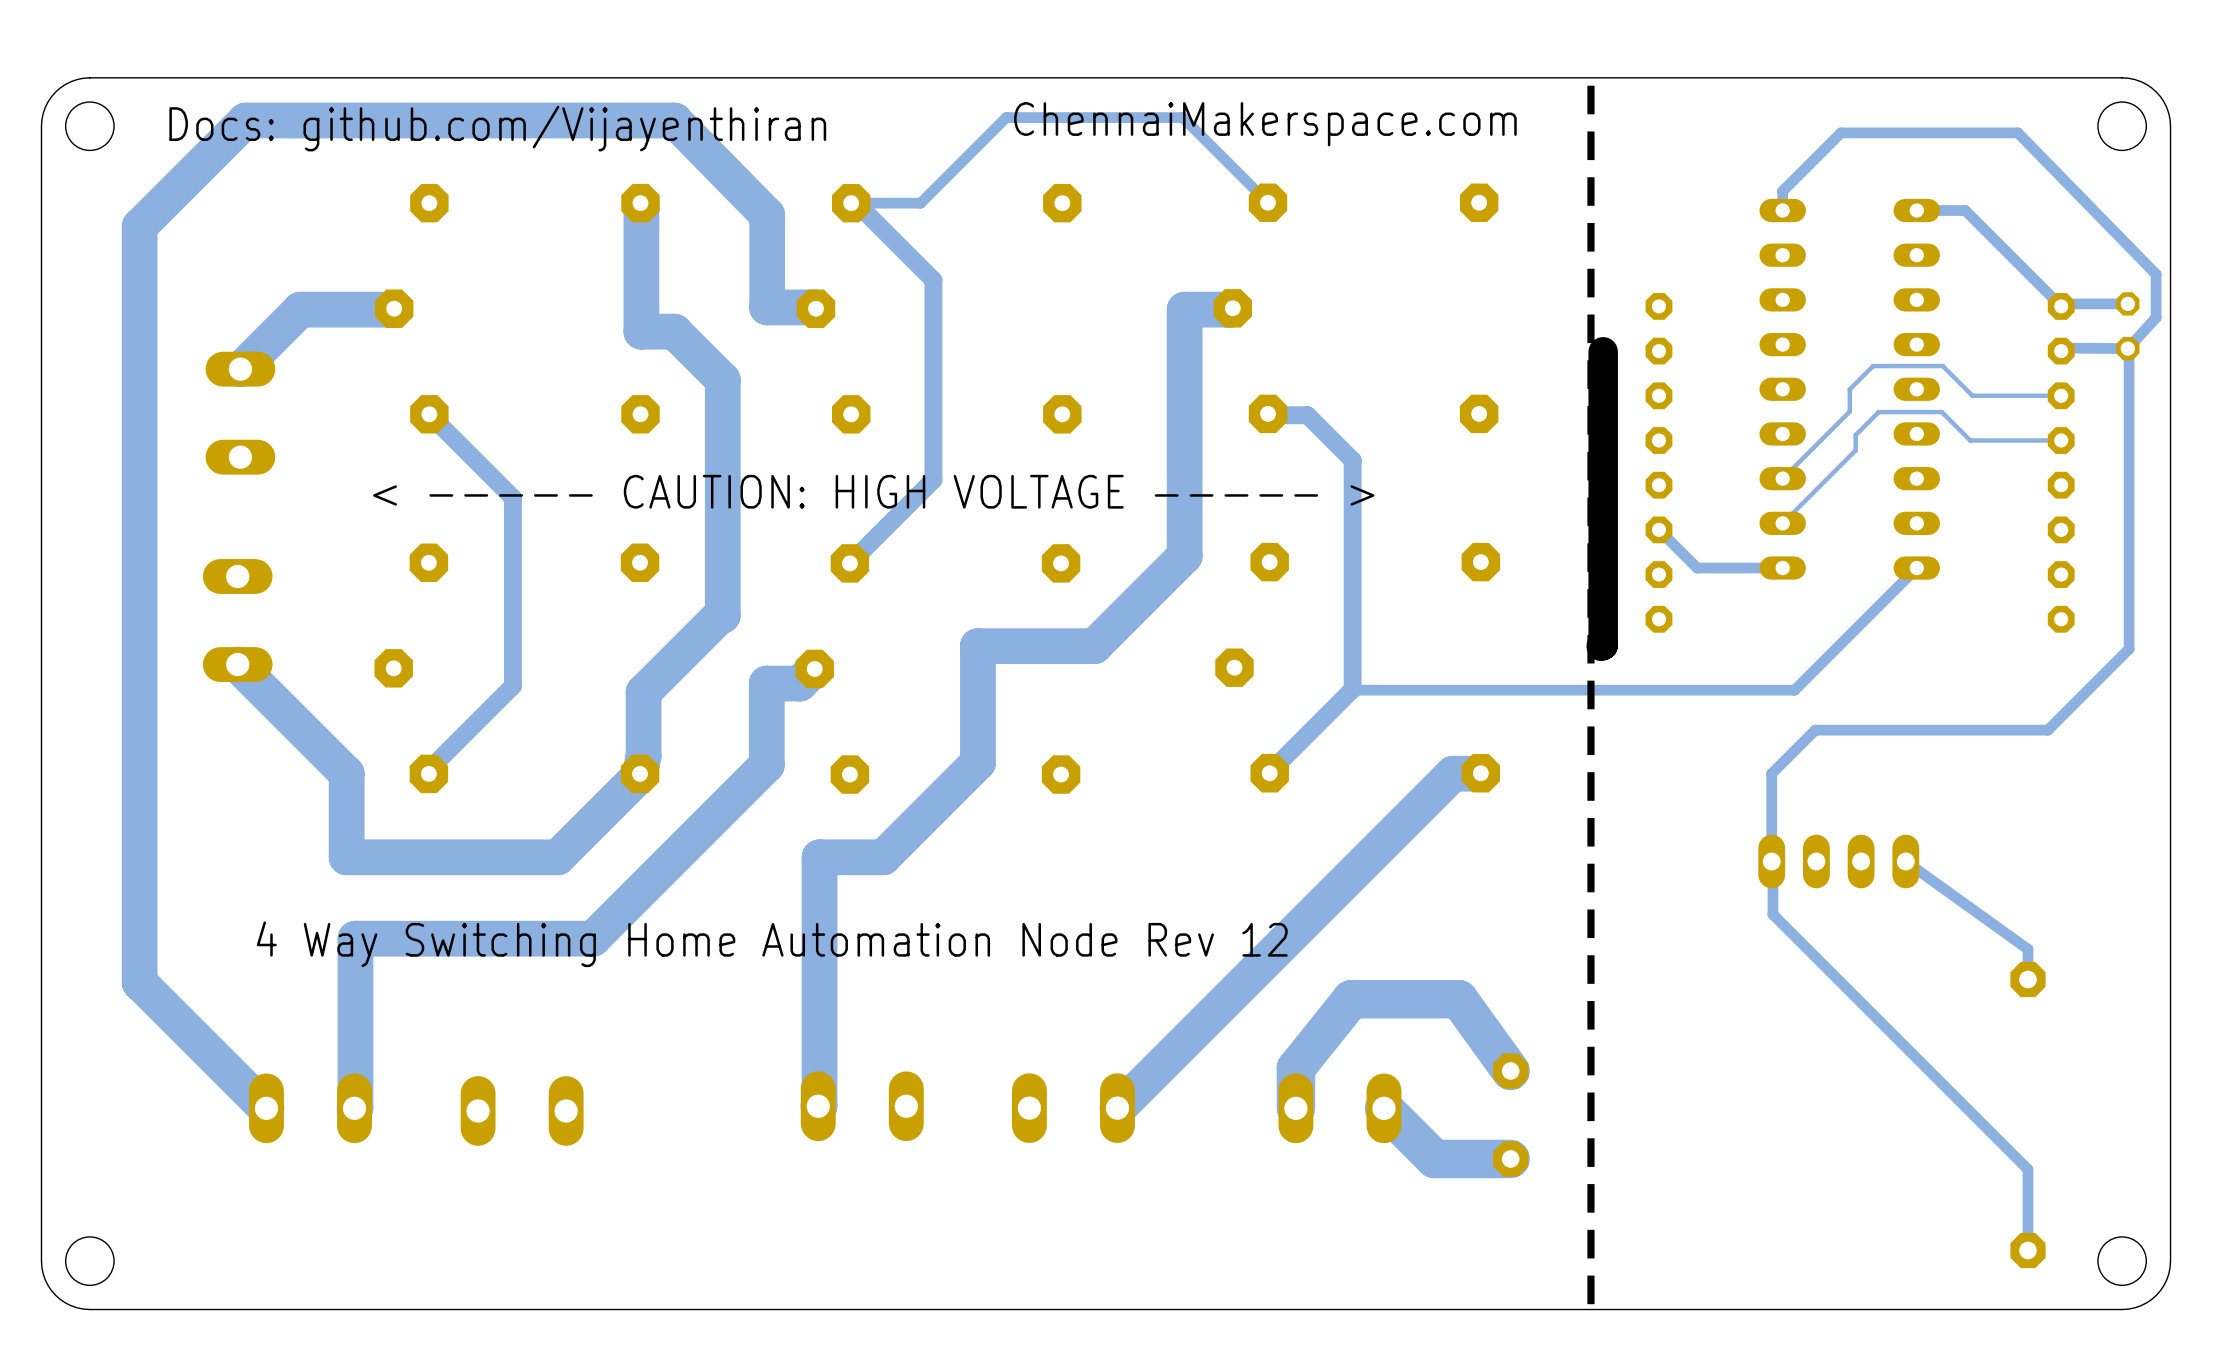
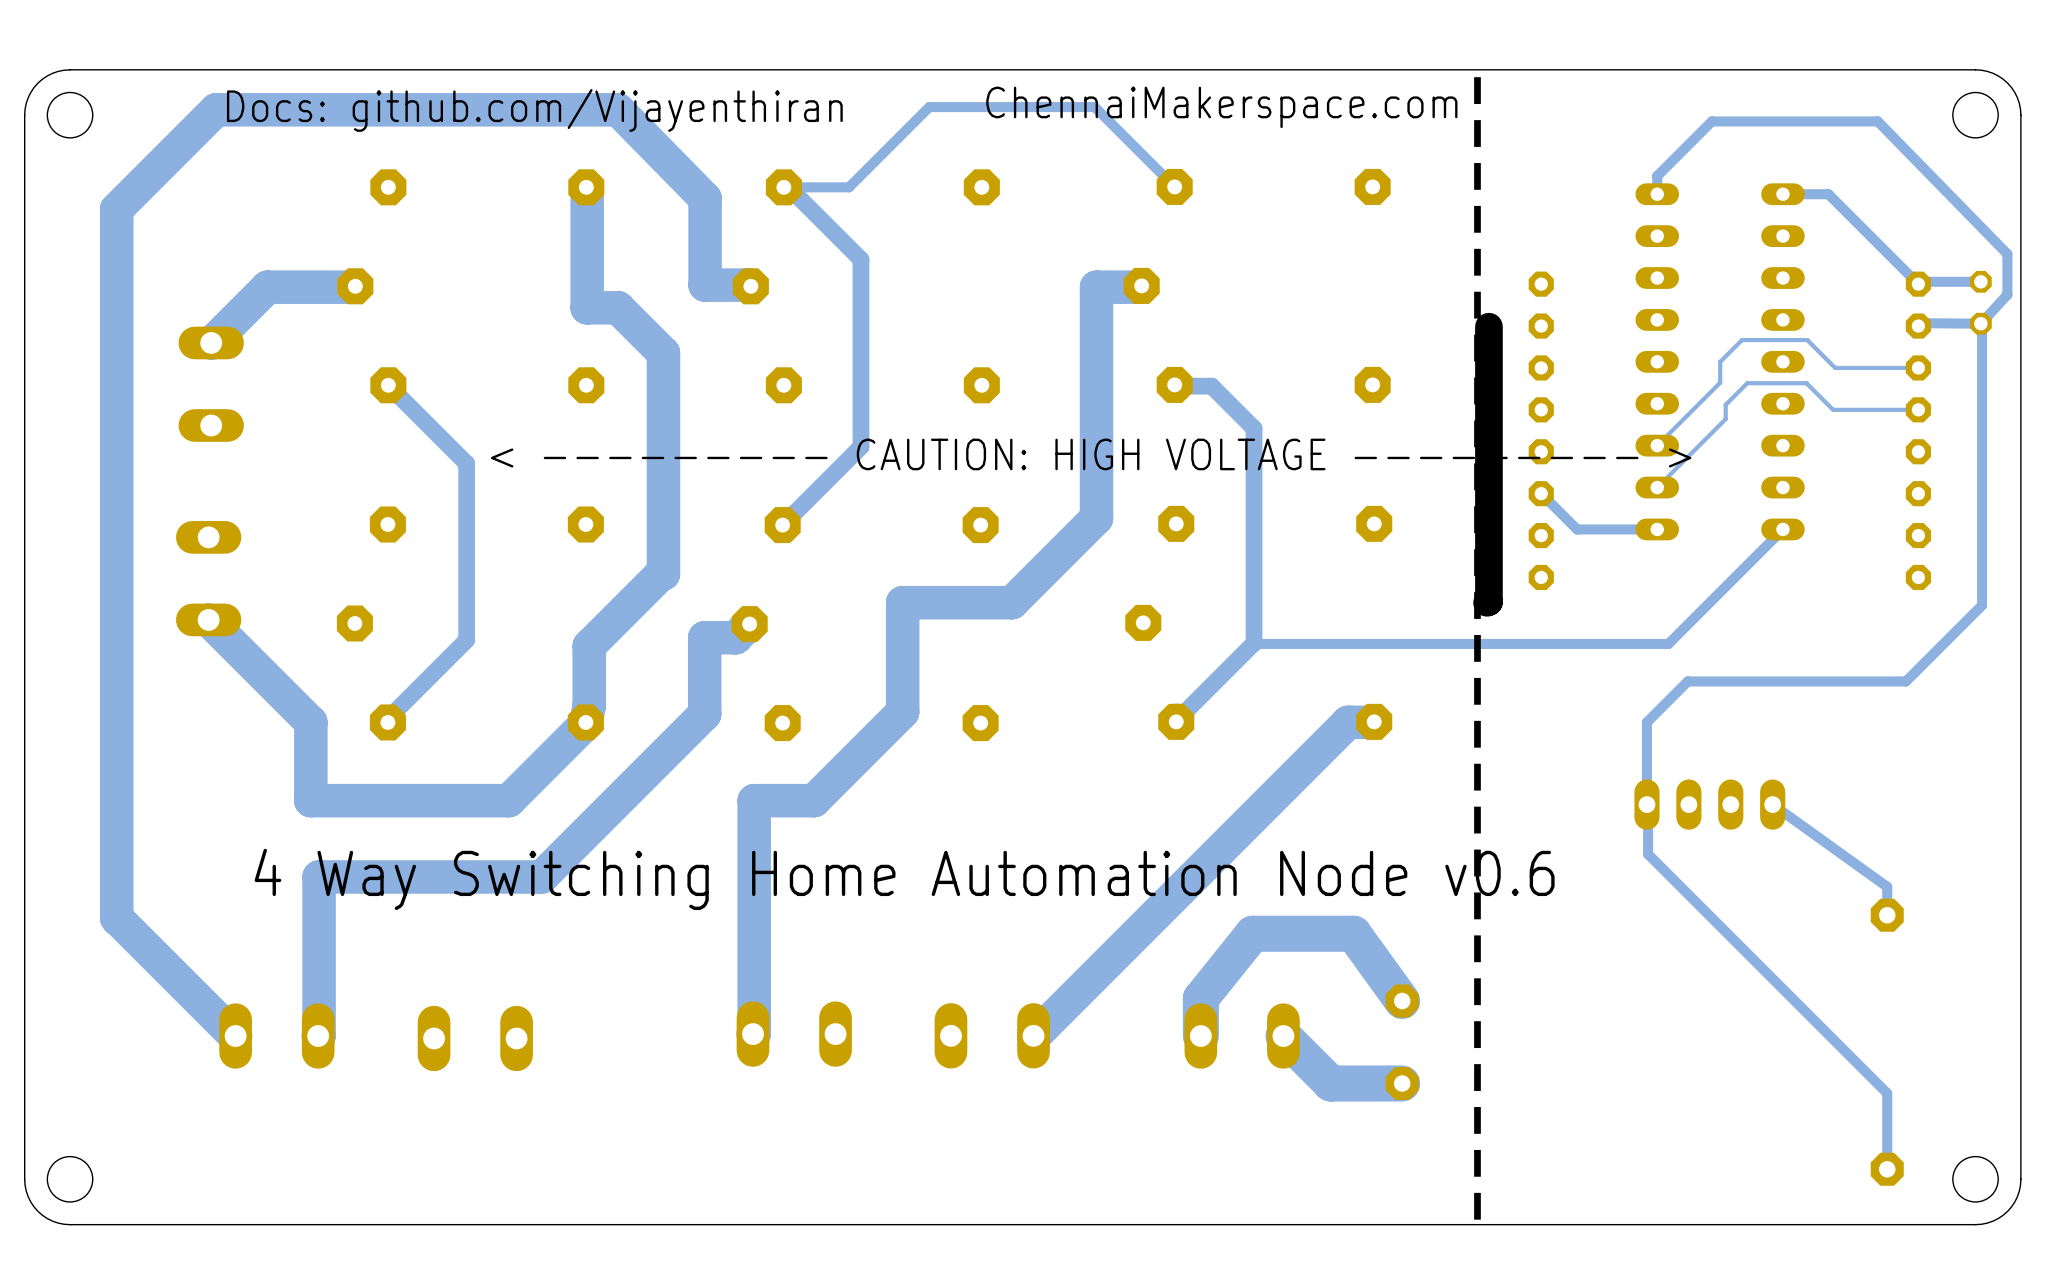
text position: ChennaiMakerspace.com (1265, 124) -> ChennaiMakerspace.com (1221, 107)
text position: Docs: github.com/Vijayenthiran (497, 128) -> Docs: github.com/Vijayenthiran (534, 110)
text: < ----- CAUTION: HIGH VOLTAGE ----- > (873, 491) -> < --------- CAUTION: HIGH VOLTAGE --------- > (1091, 454)
text: 4 Way Switching Home Automation Node Rev 12 (772, 944) -> 4 Way Switching Home Automation Node v0.6 (904, 879)

